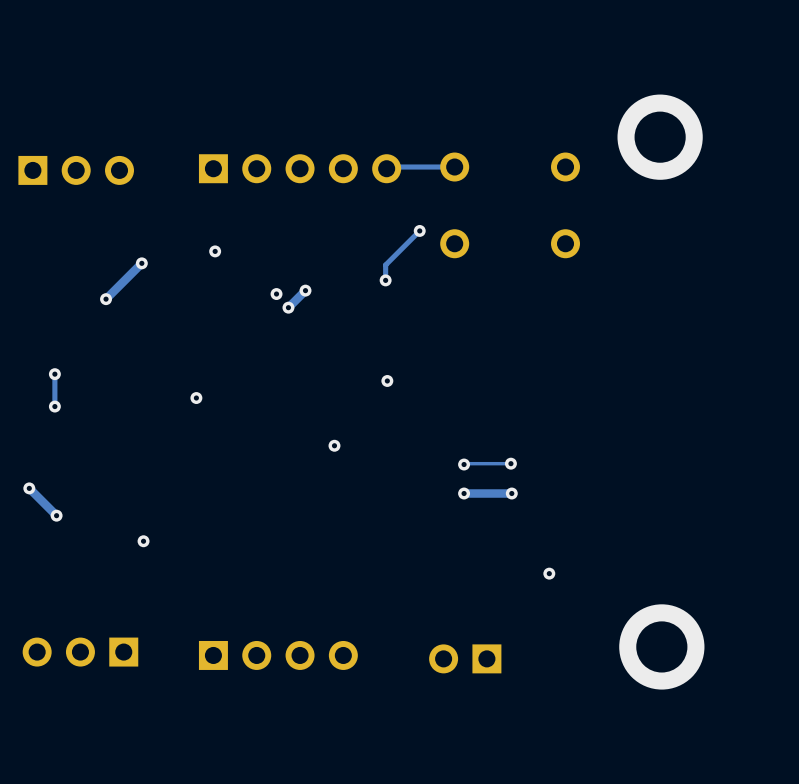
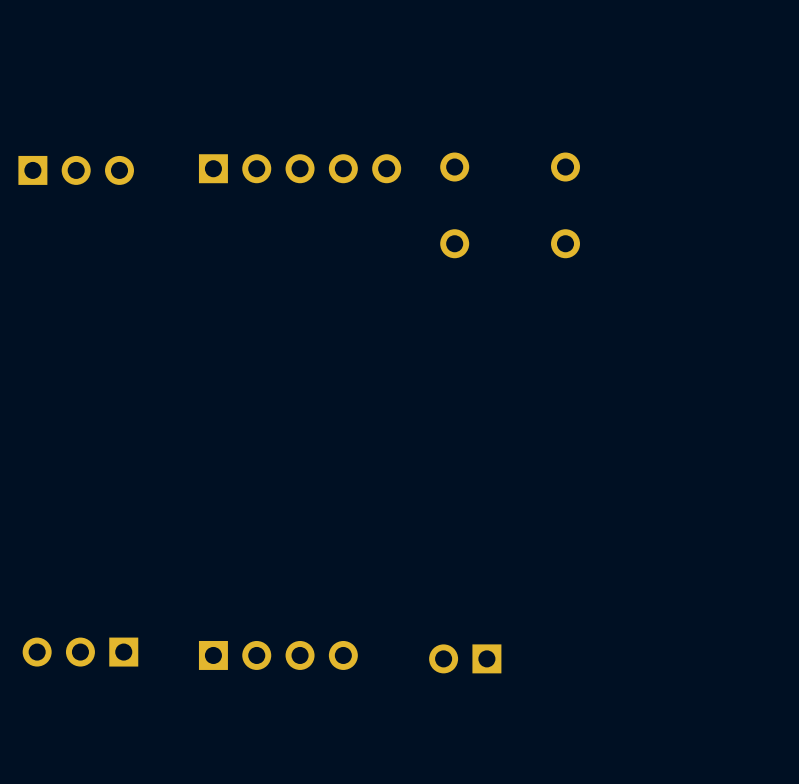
via: (660, 137) -> none
track: (454, 167) (388, 167) (386, 168) -> none
track: (419, 230) (385, 265) (385, 280) -> none
via: (419, 230) -> none
via: (215, 251) -> none
track: (141, 263) (106, 299) -> none
via: (141, 263) -> none
via: (385, 280) -> none
track: (305, 290) (288, 307) -> none
via: (305, 290) -> none
via: (276, 294) -> none
via: (106, 299) -> none
via: (288, 307) -> none
track: (54, 374) (54, 406) -> none
via: (54, 374) -> none
via: (387, 380) -> none
via: (196, 398) -> none
via: (54, 406) -> none
via: (334, 445) -> none
track: (510, 463) (464, 464) -> none
via: (510, 463) -> none
via: (464, 464) -> none
track: (29, 488) (56, 515) -> none
via: (29, 488) -> none
via: (464, 493) -> none
track: (511, 493) (464, 493) -> none
via: (511, 493) -> none
via: (56, 515) -> none
via: (143, 541) -> none
via: (549, 573) -> none
via: (661, 646) -> none

